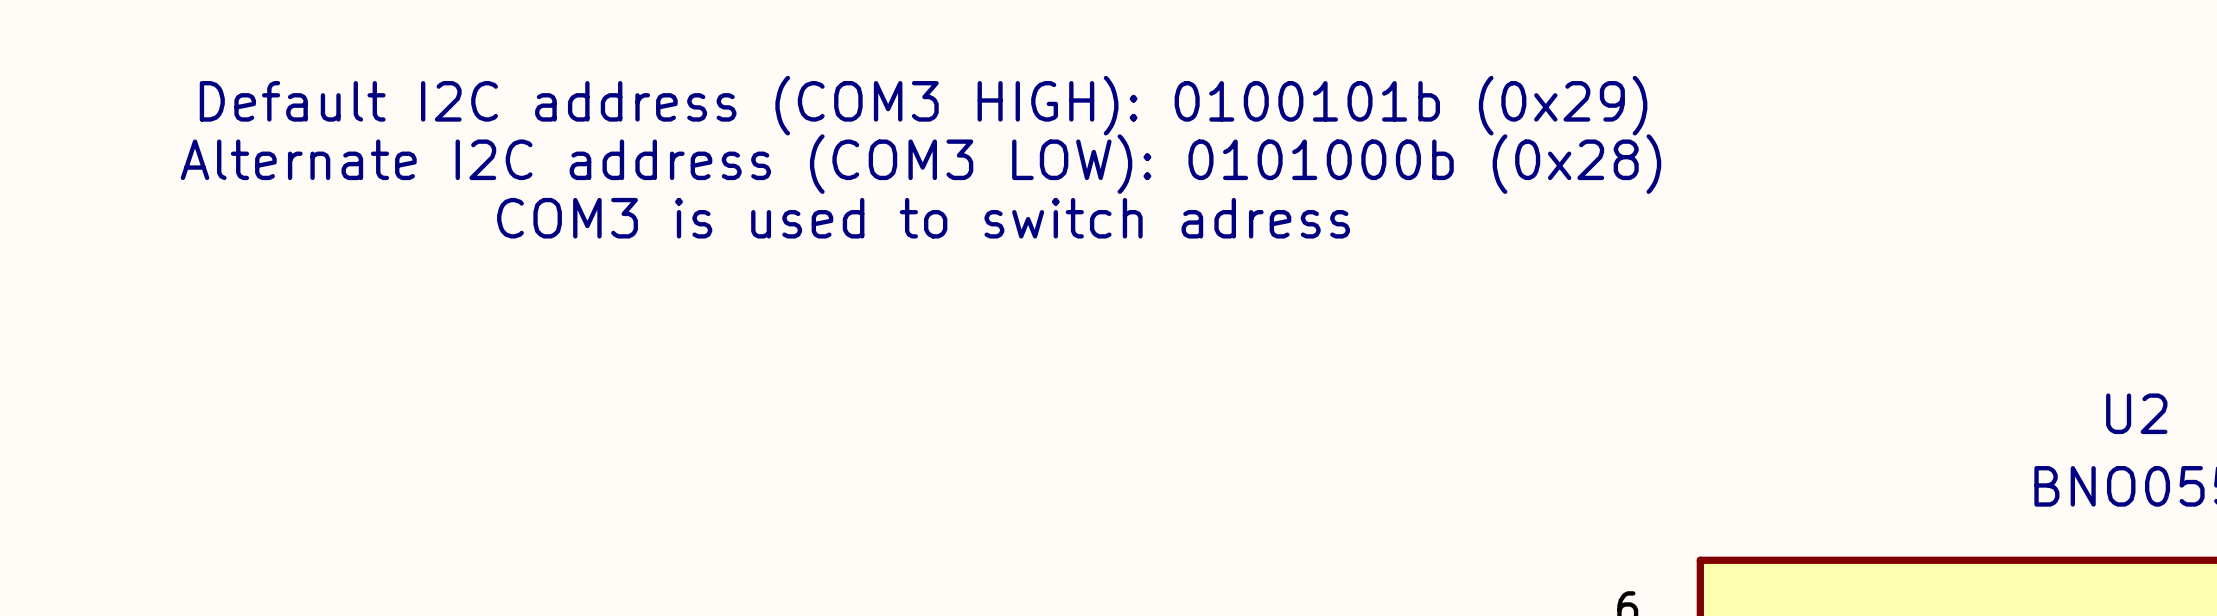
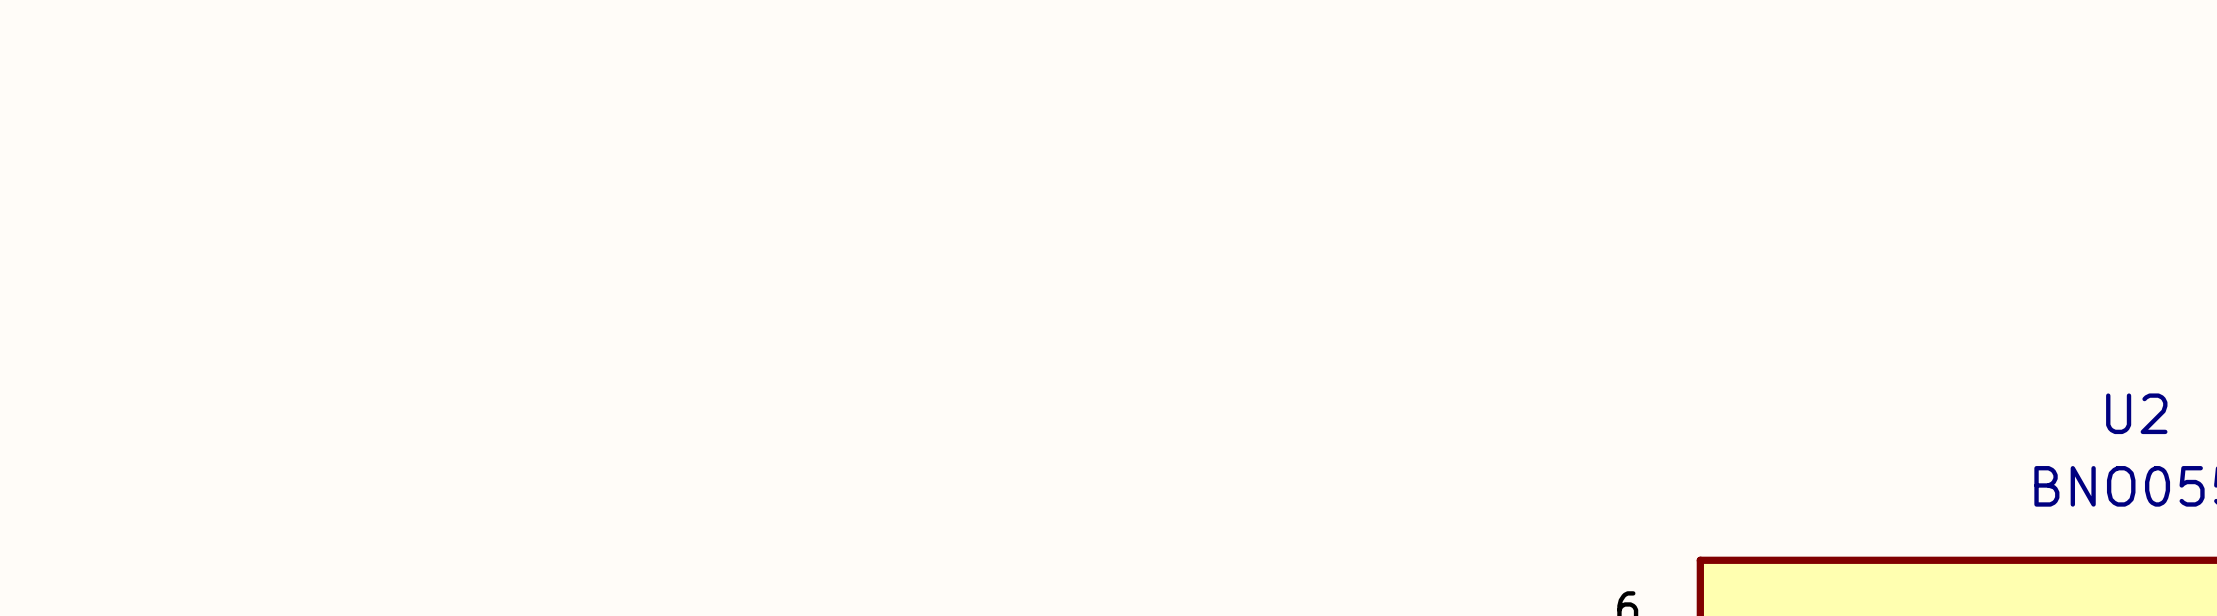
text: Default I2C address (COM3 HIGH): 0100101b (0x29) (923, 105) -> none
text: Alternate I2C address (COM3 LOW): 0101000b (0x28) (920, 164) -> none
text: COM3 is used to switch adress (923, 218) -> none

